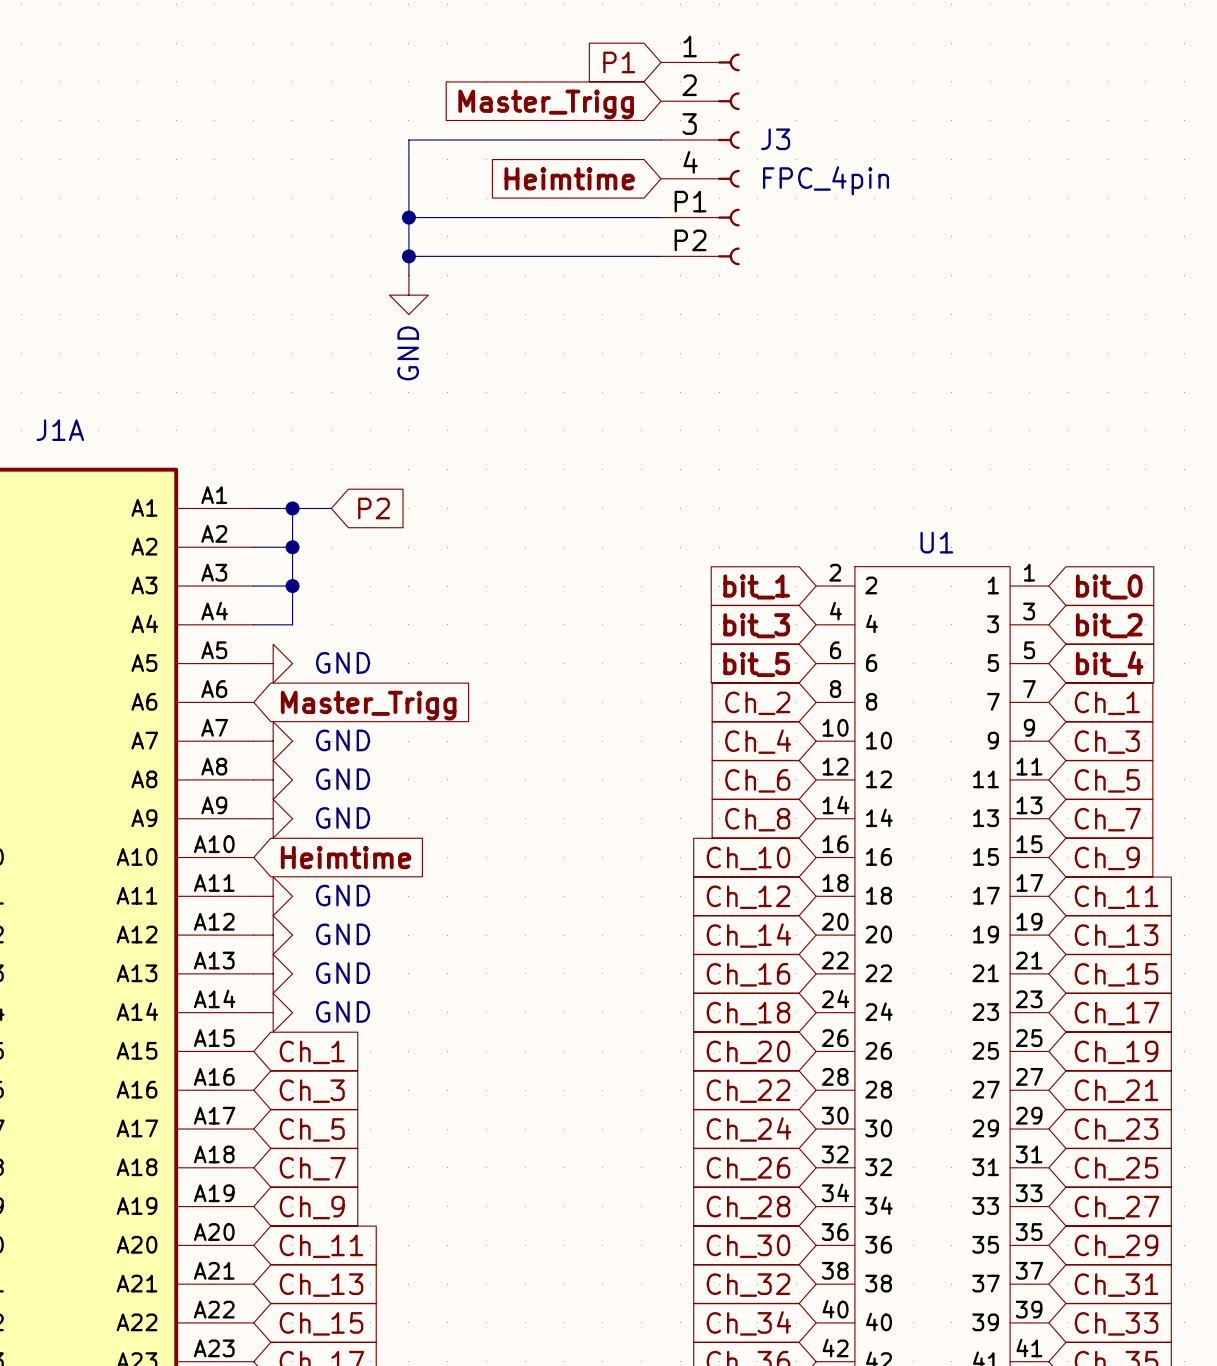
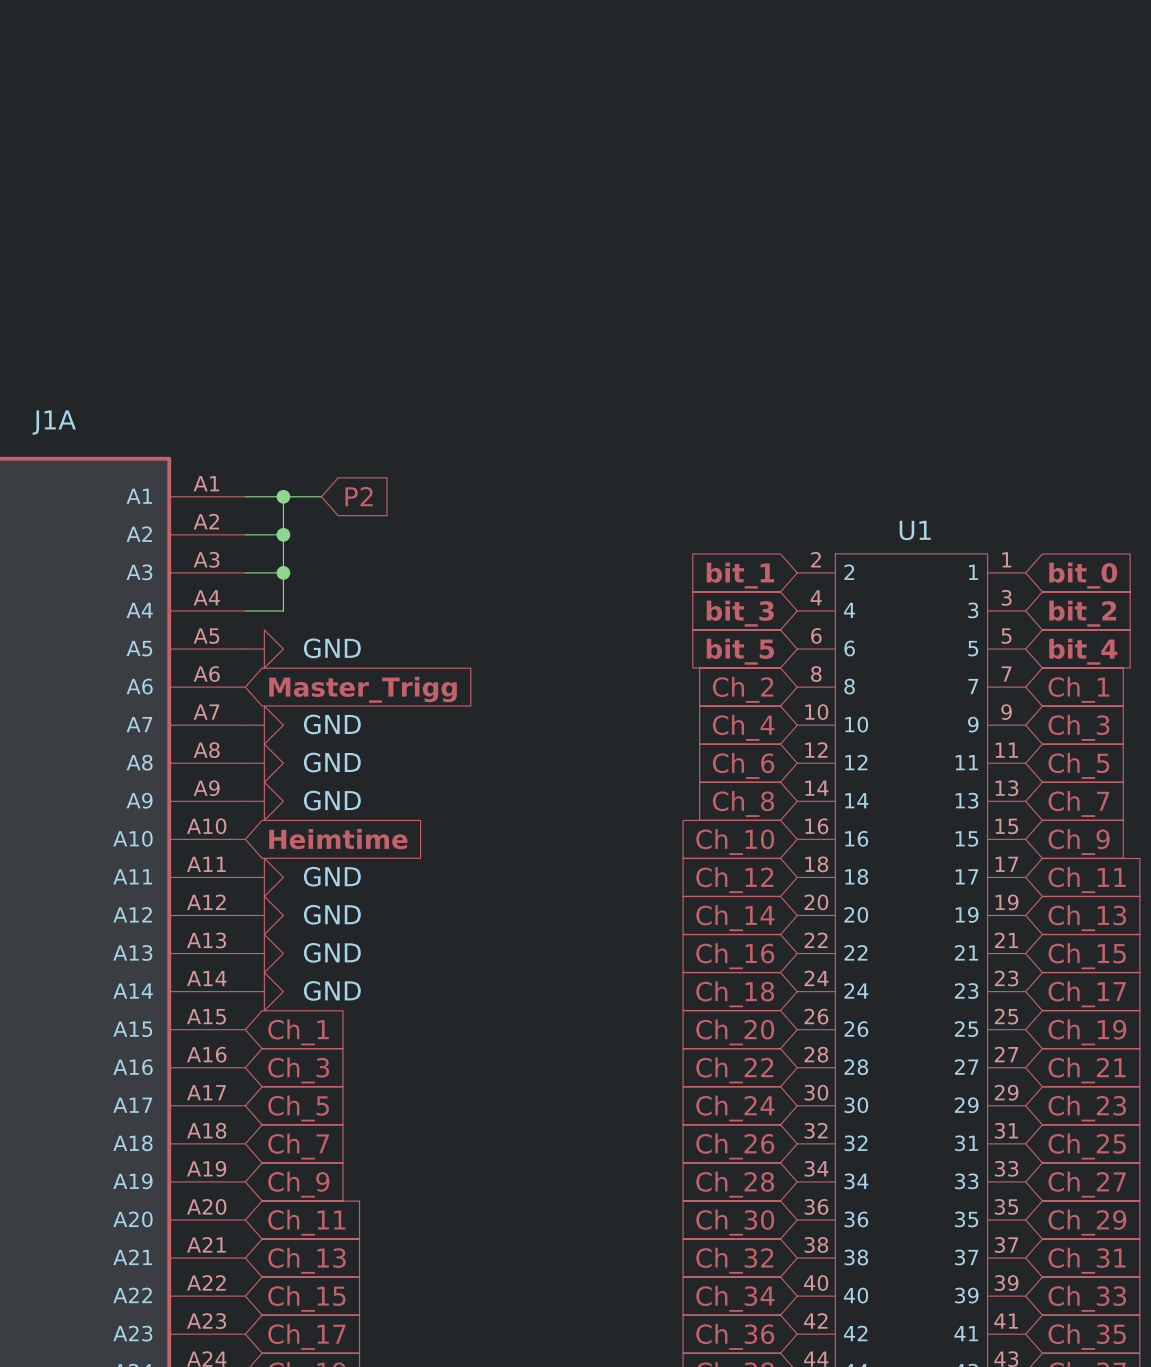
global label: P1 (619, 62) -> none
global label: Master_Trigg (546, 104) -> none
wire: (661, 140) (408, 140) (408, 275) -> none
J3: FPC_4pin (700, 159) -> none
global label: Heimtime (569, 178) -> none
wire: (408, 217) (661, 217) -> none
junction: (408, 217) -> none
wire: (408, 256) (661, 256) -> none
junction: (408, 256) -> none
power symbol: GND (408, 295) -> none

